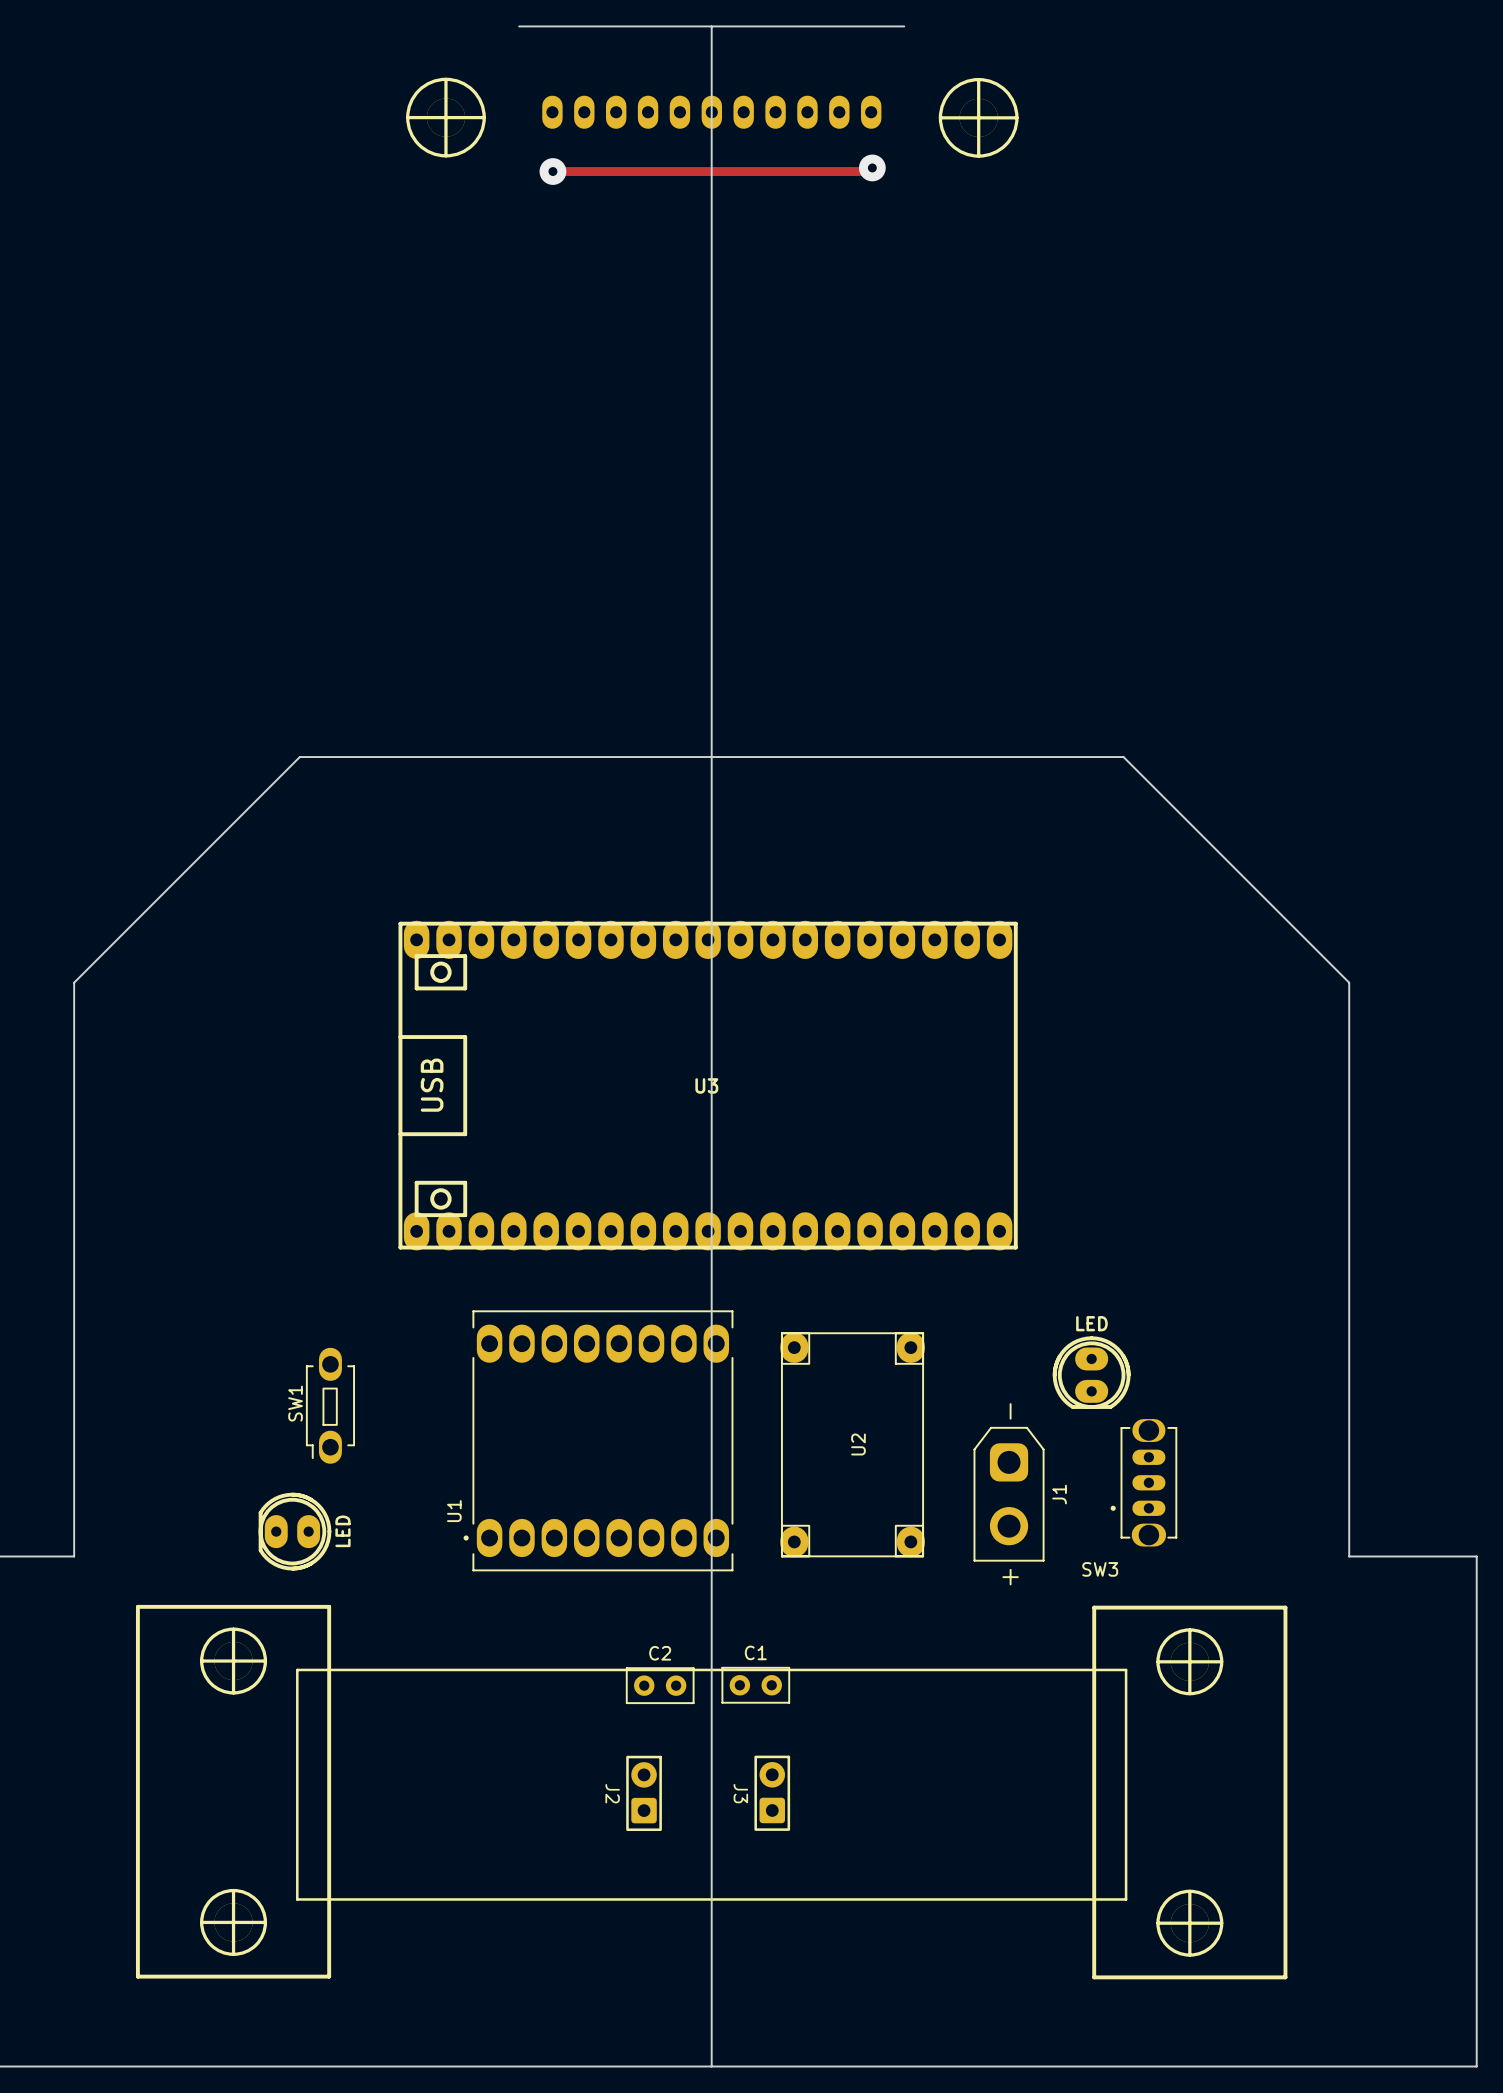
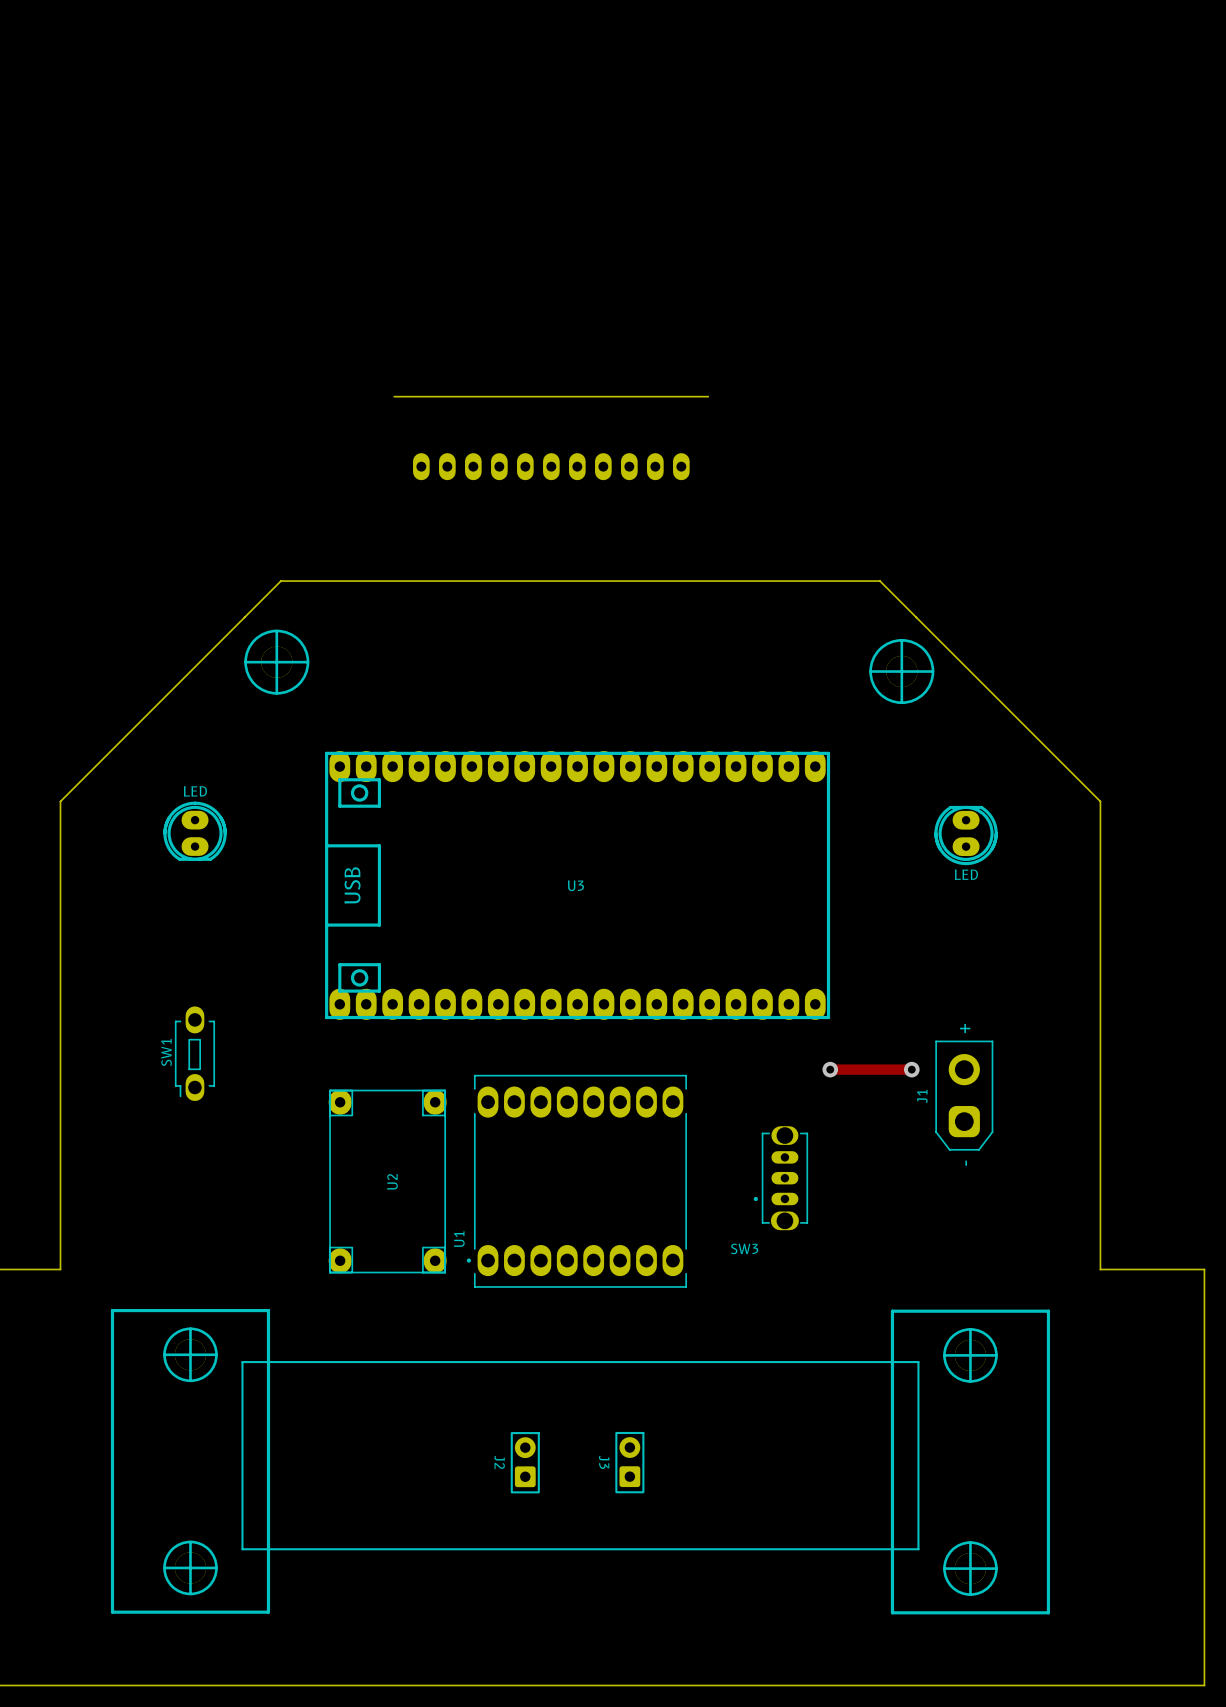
board edge: (519, 26) (904, 26) -> none
board edge: (711, 26) (711, 2066) -> none
part: (711, 112) -> none
part: (445, 117) -> none
part: (978, 117) -> none
track: (872, 167) (868, 171) (552, 171) -> none
via: (872, 167) -> none
via: (552, 171) -> none
board edge: none -> (394, 396) (708, 396)
part: none -> (551, 466)
board edge: (299, 757) (1123, 757) -> (244, 617) (280, 581) (879, 581) (916, 617)
part: none -> (276, 662)
part: none -> (901, 671)
part: none -> LED (195, 831)
part: none -> LED (966, 835)
track: none -> (830, 1069) (911, 1069)
via: none -> (830, 1069)
via: none -> (911, 1069)
part: LED (1091, 1372) -> none
SW1 position: (330, 1405) -> (194, 1053)
U1 position: (598, 1440) -> (576, 1181)
U2 position: (852, 1444) -> (387, 1181)
SW3 position: (1143, 1482) -> (780, 1178)
J1 rotation: 0° (1009, 1494) -> 180° (964, 1095)
J1 position: (1009, 1494) -> (964, 1095)
part: LED (295, 1531) -> none
C2: (660, 1685) -> none
C1: (755, 1685) -> none

